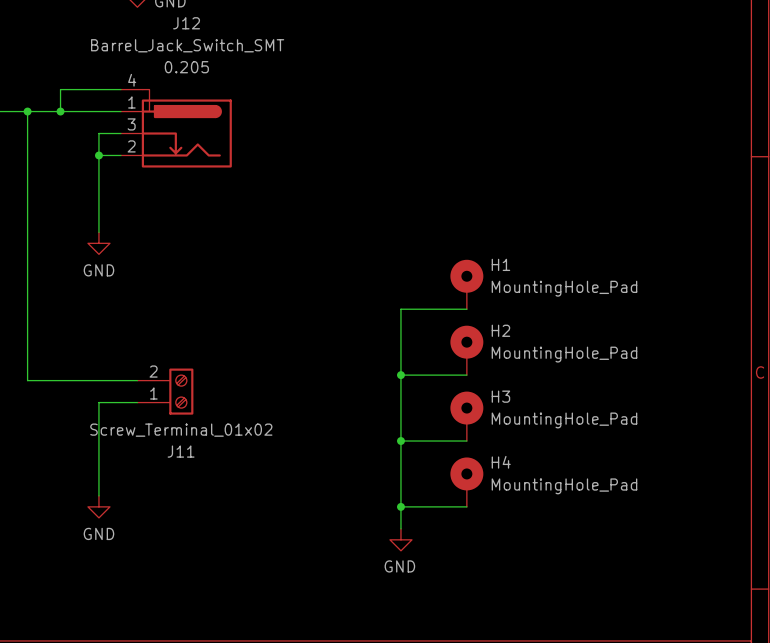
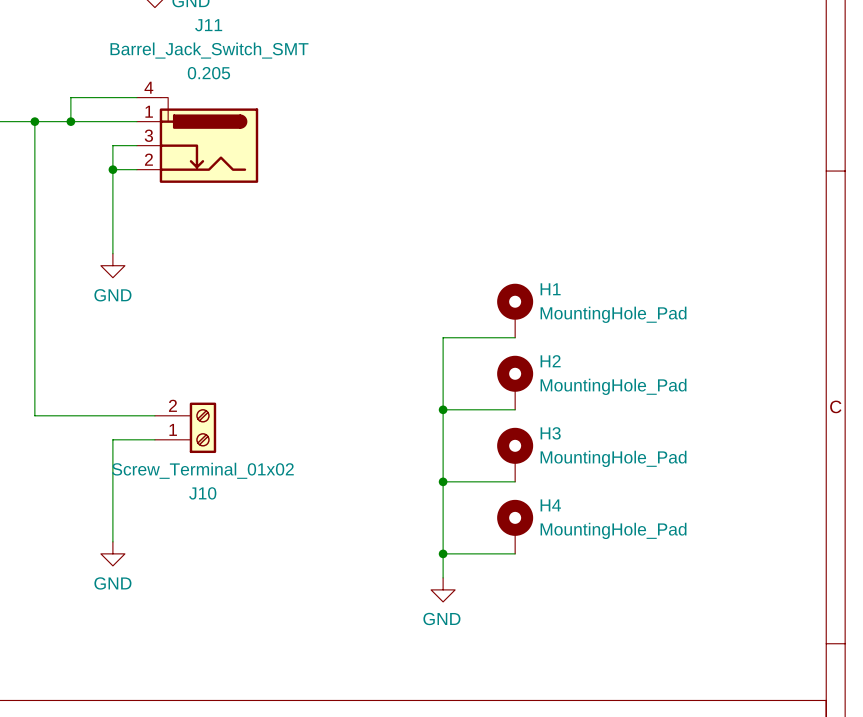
J12 name: J12 (186, 23) -> J11 (208, 25)
J11 name: J11 (181, 451) -> J10 (202, 493)

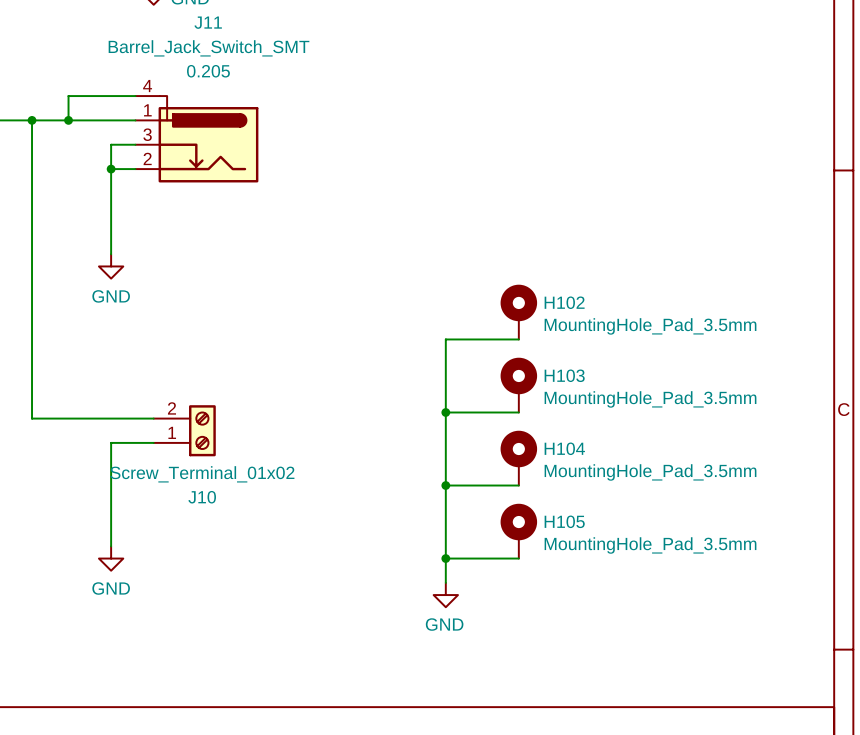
H1 name: H1 (550, 289) -> H102 (564, 302)
H1 value: MountingHole_Pad (613, 314) -> MountingHole_Pad_3.5mm (650, 326)
H2 name: H2 (550, 361) -> H103 (564, 375)
H2 value: MountingHole_Pad (613, 386) -> MountingHole_Pad_3.5mm (650, 399)
H3 name: H3 (550, 433) -> H104 (564, 448)
H3 value: MountingHole_Pad (613, 458) -> MountingHole_Pad_3.5mm (650, 472)
H4 name: H4 (550, 505) -> H105 (564, 521)
H4 value: MountingHole_Pad (613, 530) -> MountingHole_Pad_3.5mm (650, 545)

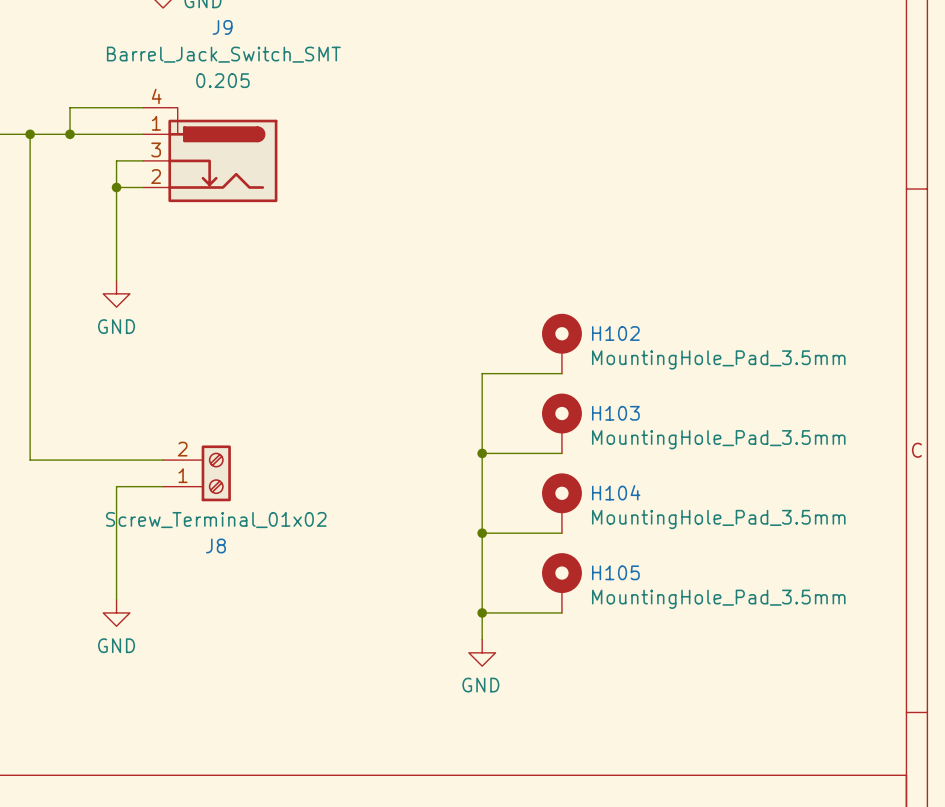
J11 name: J11 (208, 22) -> J9 (222, 27)
J10 name: J10 (202, 497) -> J8 (215, 545)

